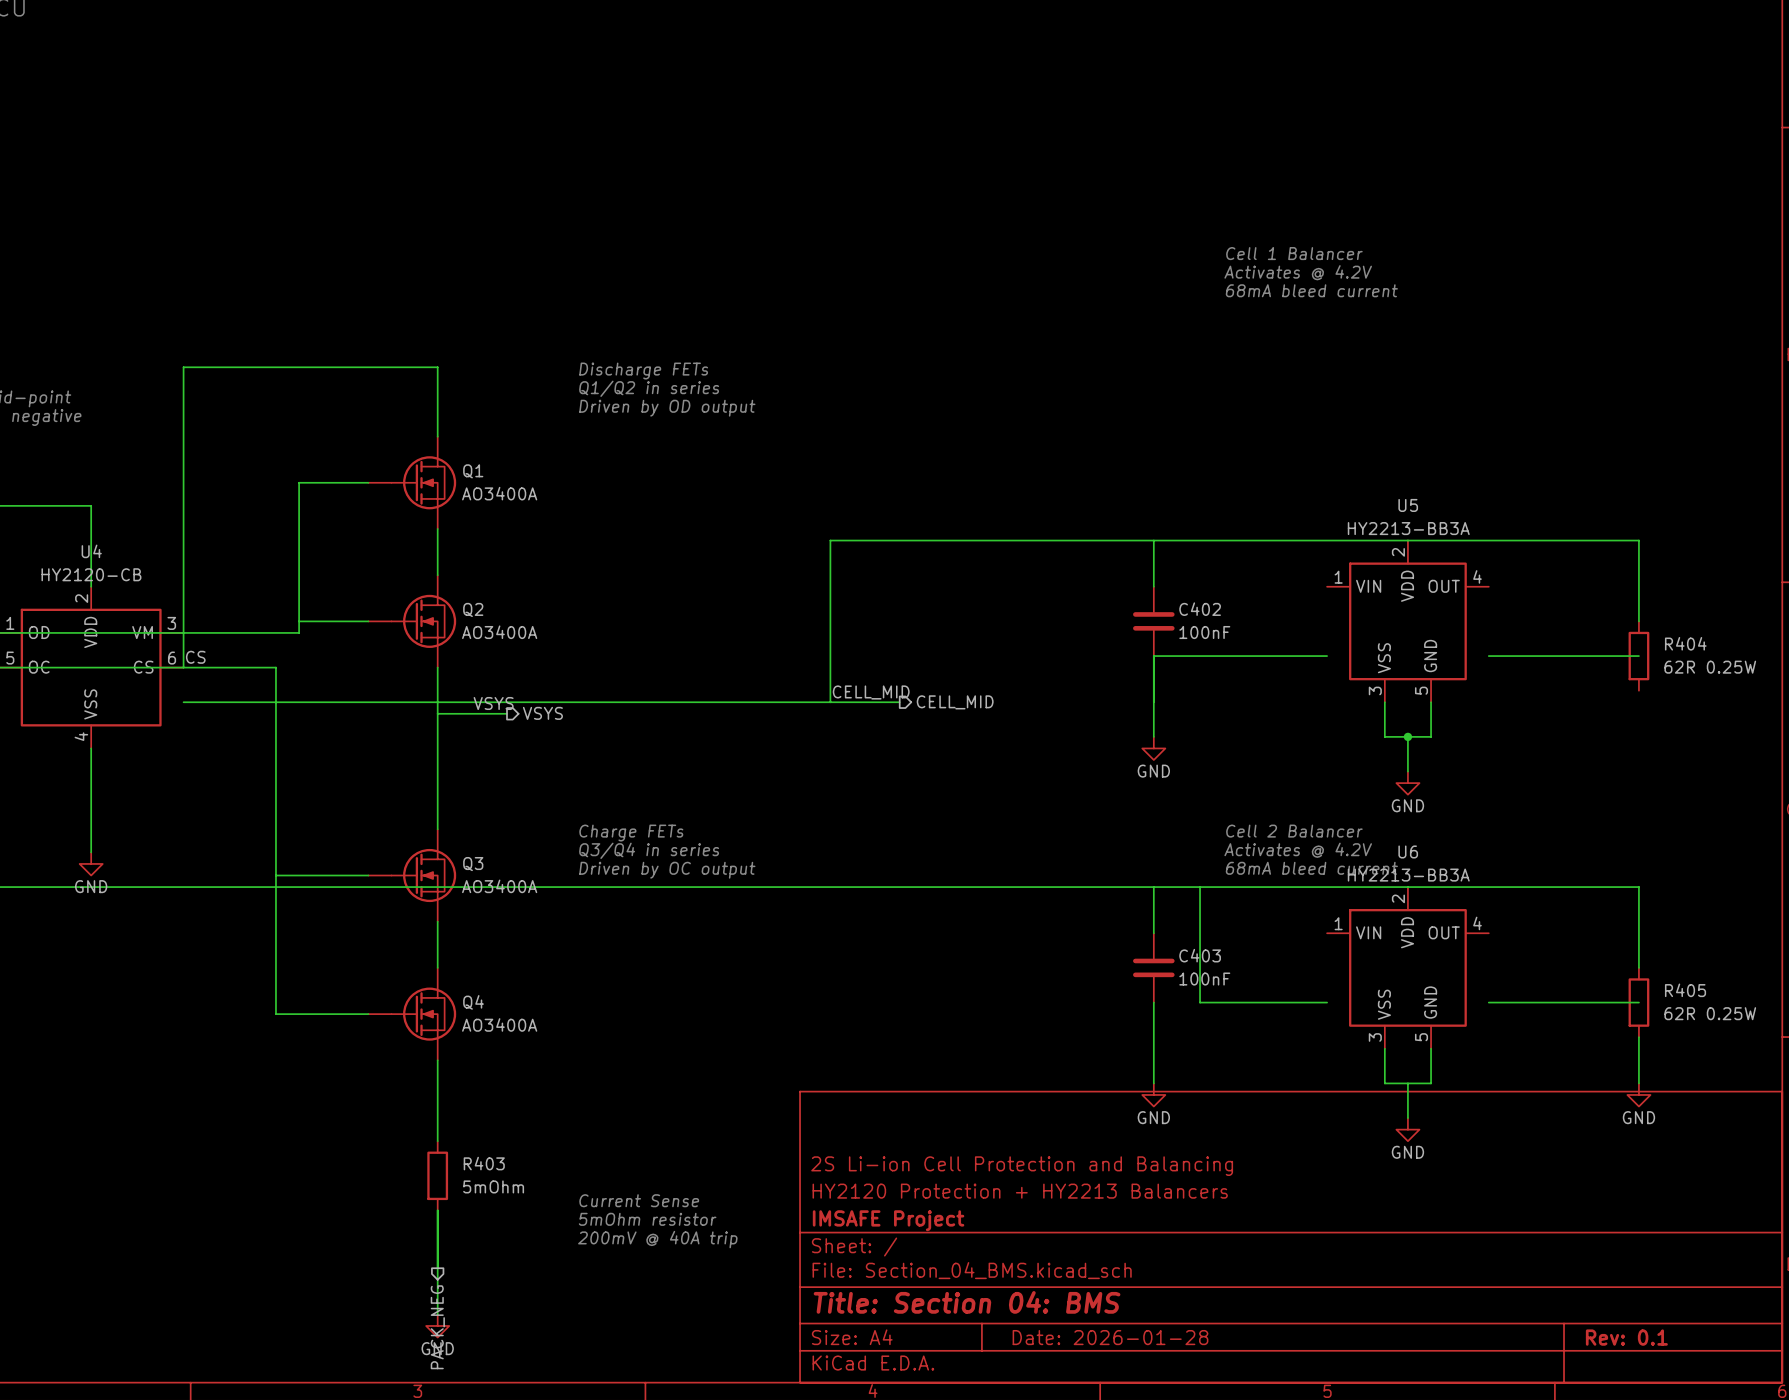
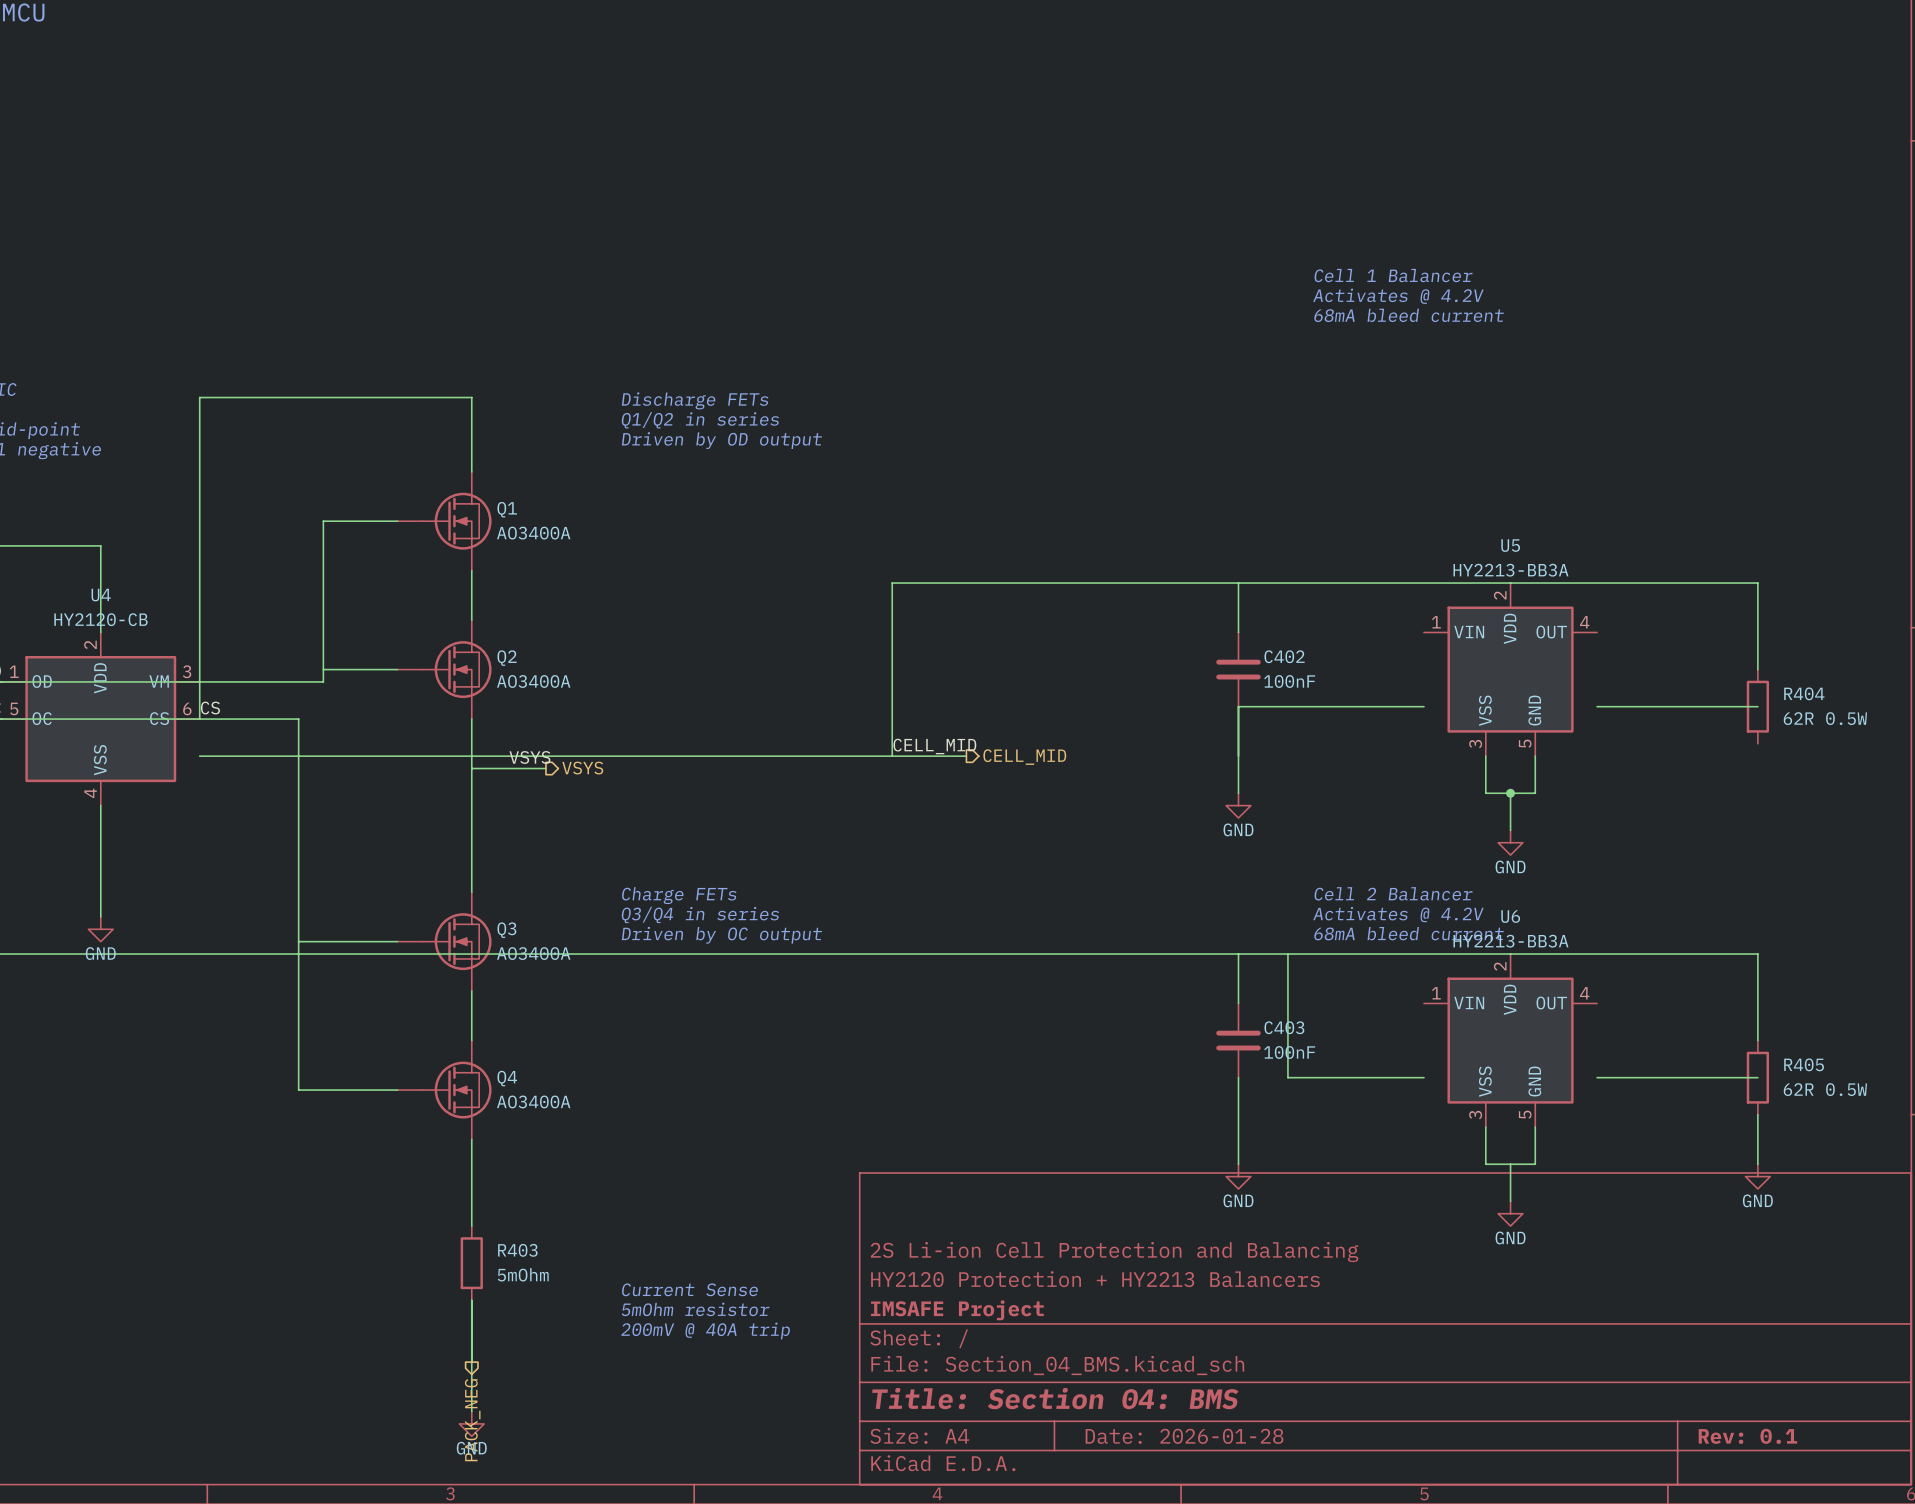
R404 value: 62R 0.25W (1710, 667) -> 62R 0.5W (1825, 718)
R405 value: 62R 0.25W (1710, 1013) -> 62R 0.5W (1825, 1089)

